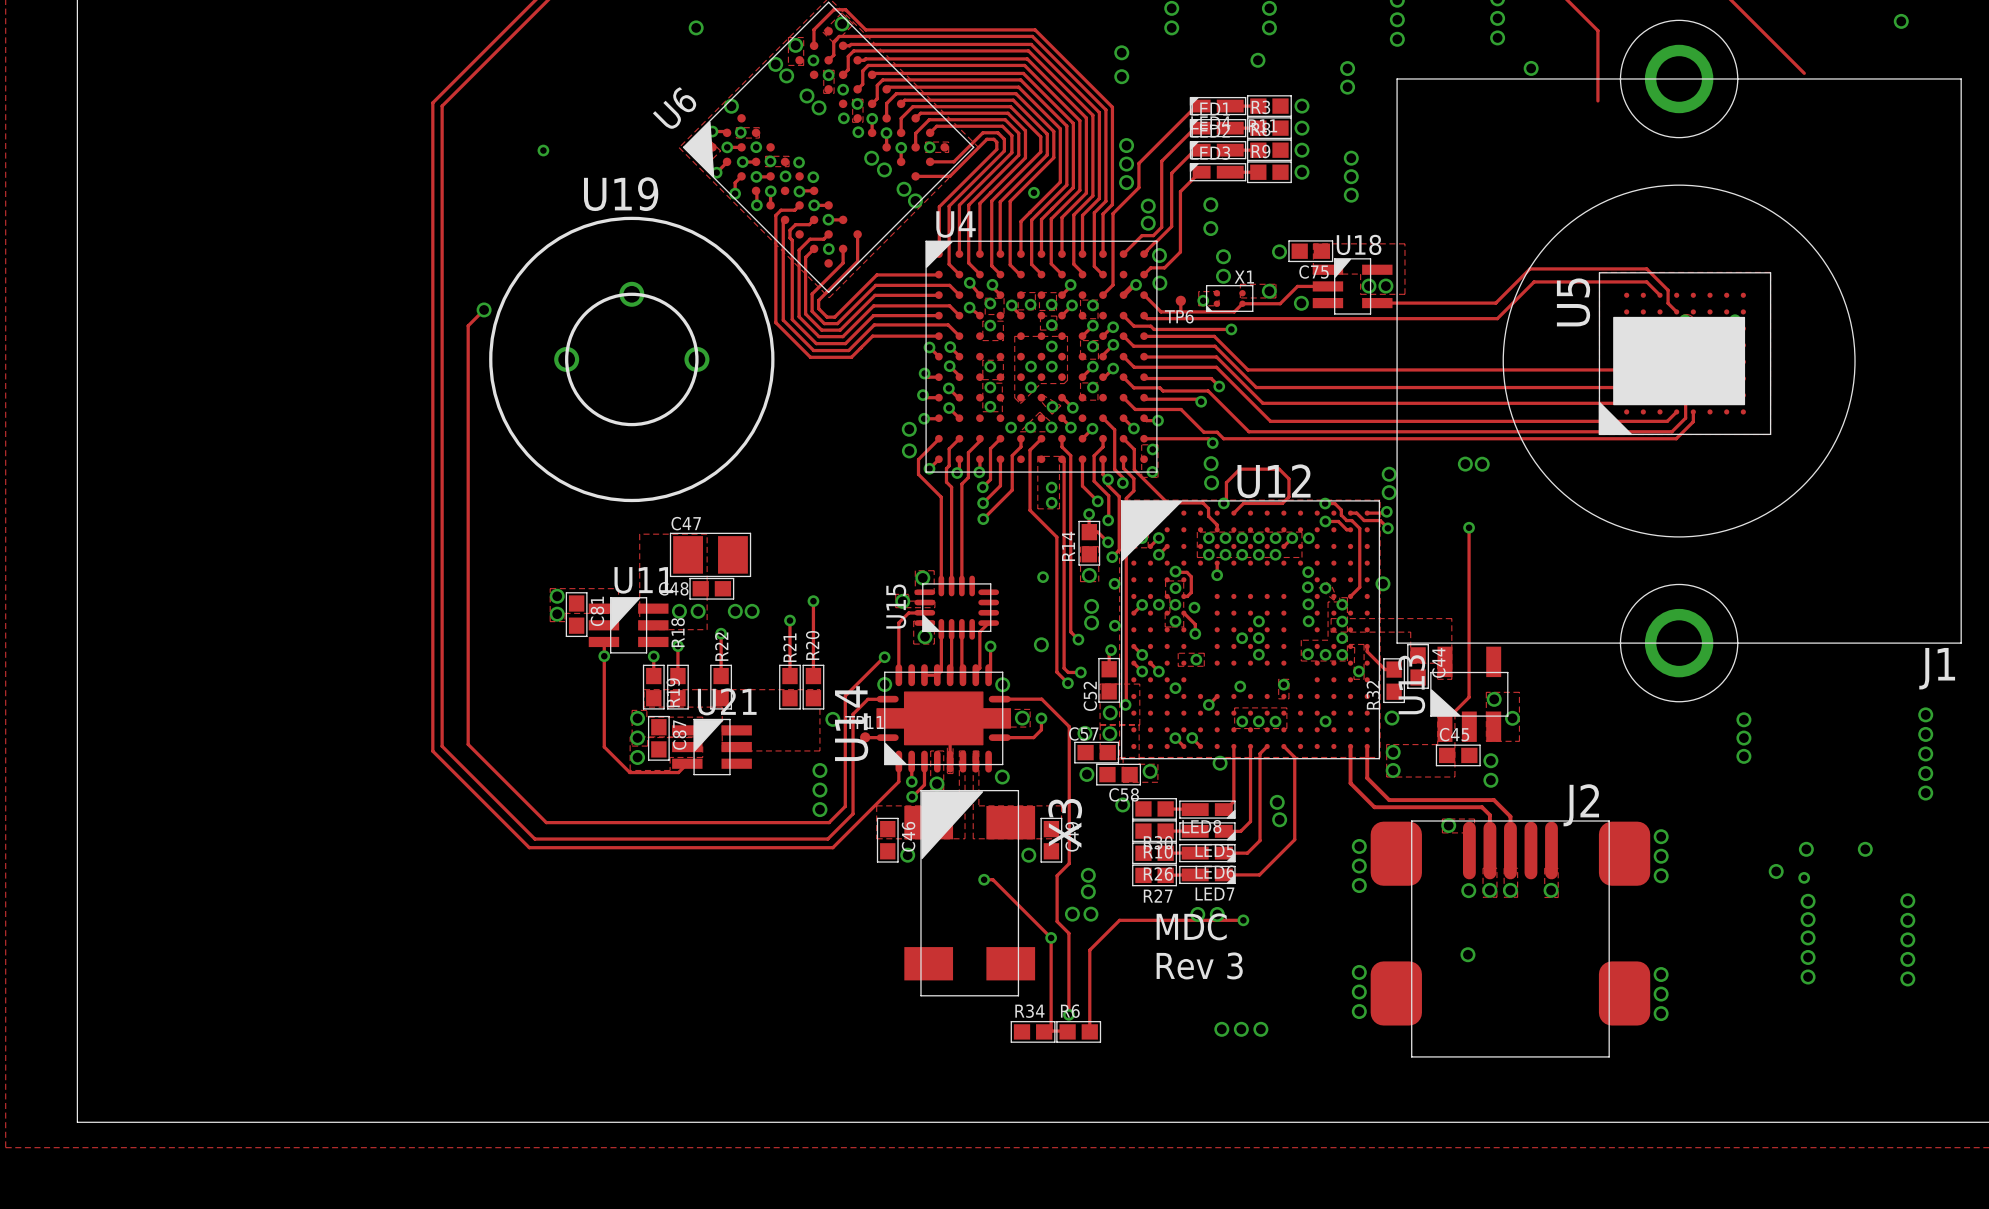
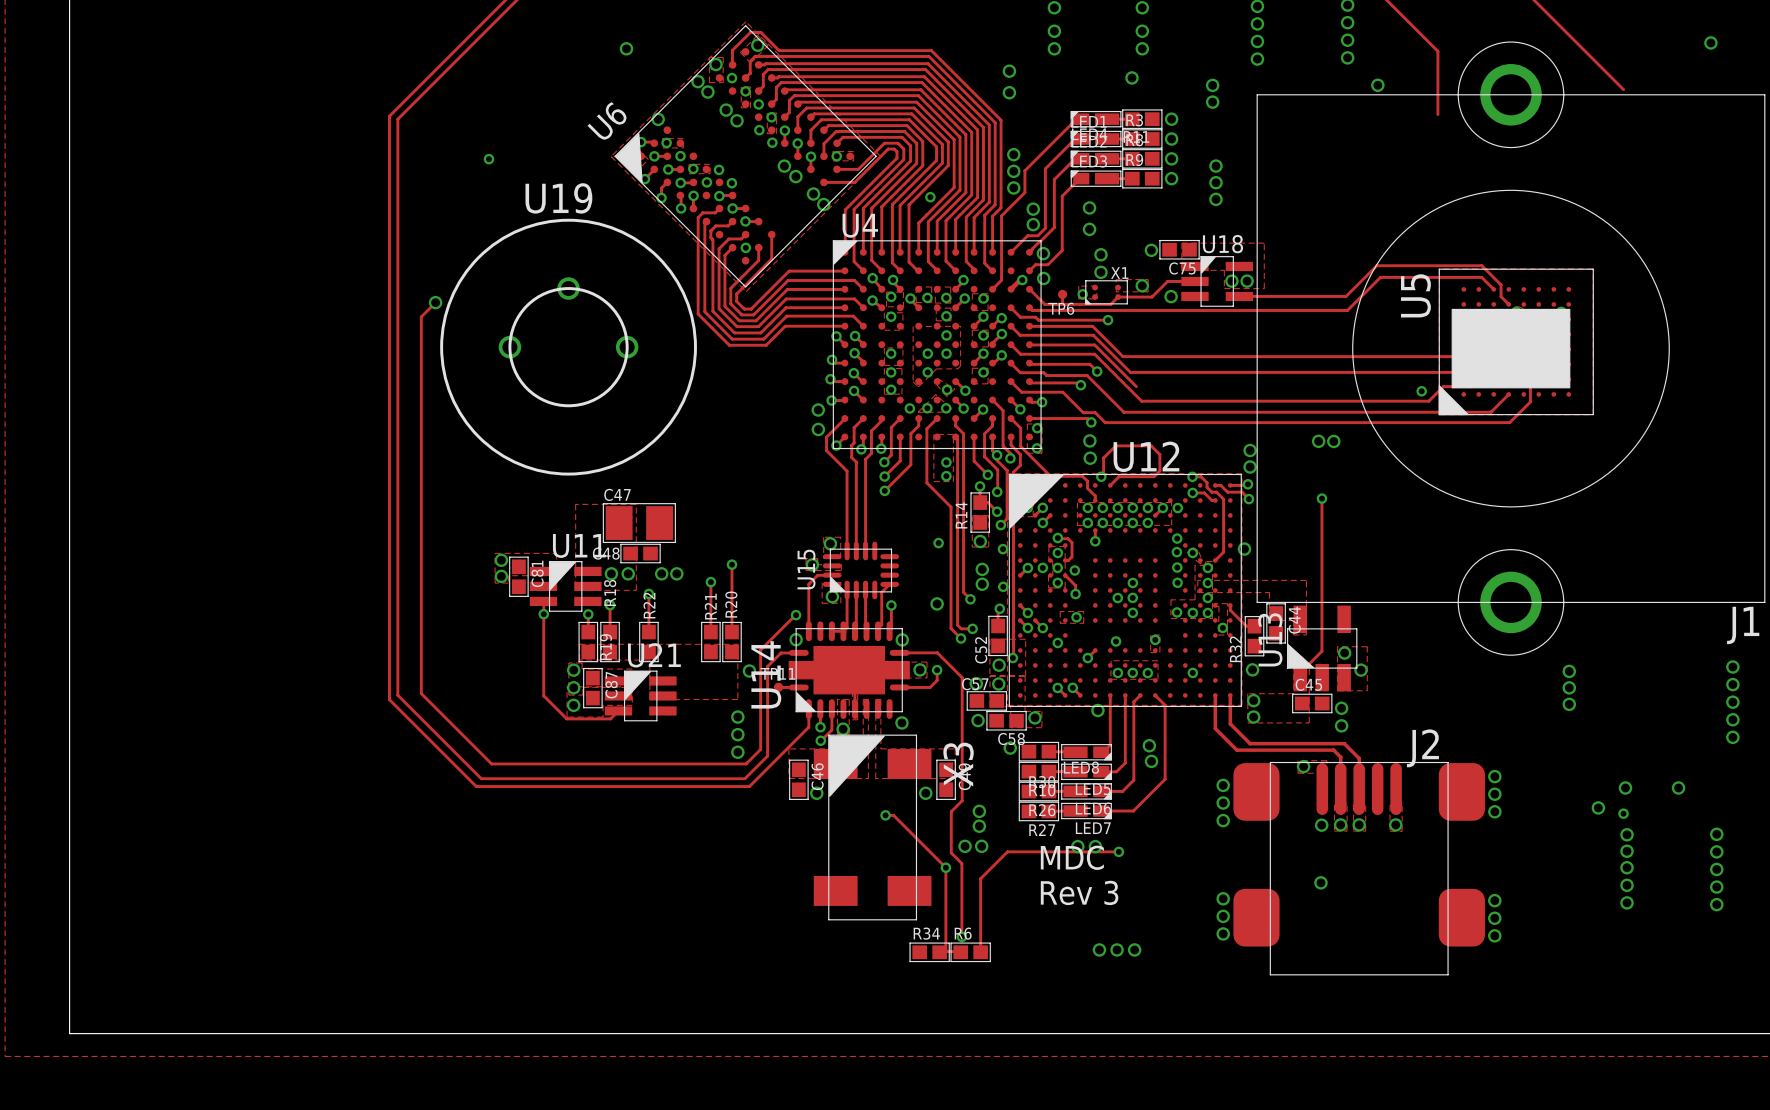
track: (1693, 395) (1685, 402) (1685, 418) (1671, 431) (1656, 431) -> (1500, 402) (1490, 412)
track: (1262, 403) (1604, 403) -> (1141, 401) (1428, 401) (1443, 386)
via: none -> (1421, 391)
track: (1693, 411) (1693, 421) (1676, 438) (1223, 438) -> (1523, 379) (1530, 386) (1530, 401) (1509, 422) (1105, 422) (1101, 418)
track: (1268, 419) (1270, 421) (1667, 421) -> none

